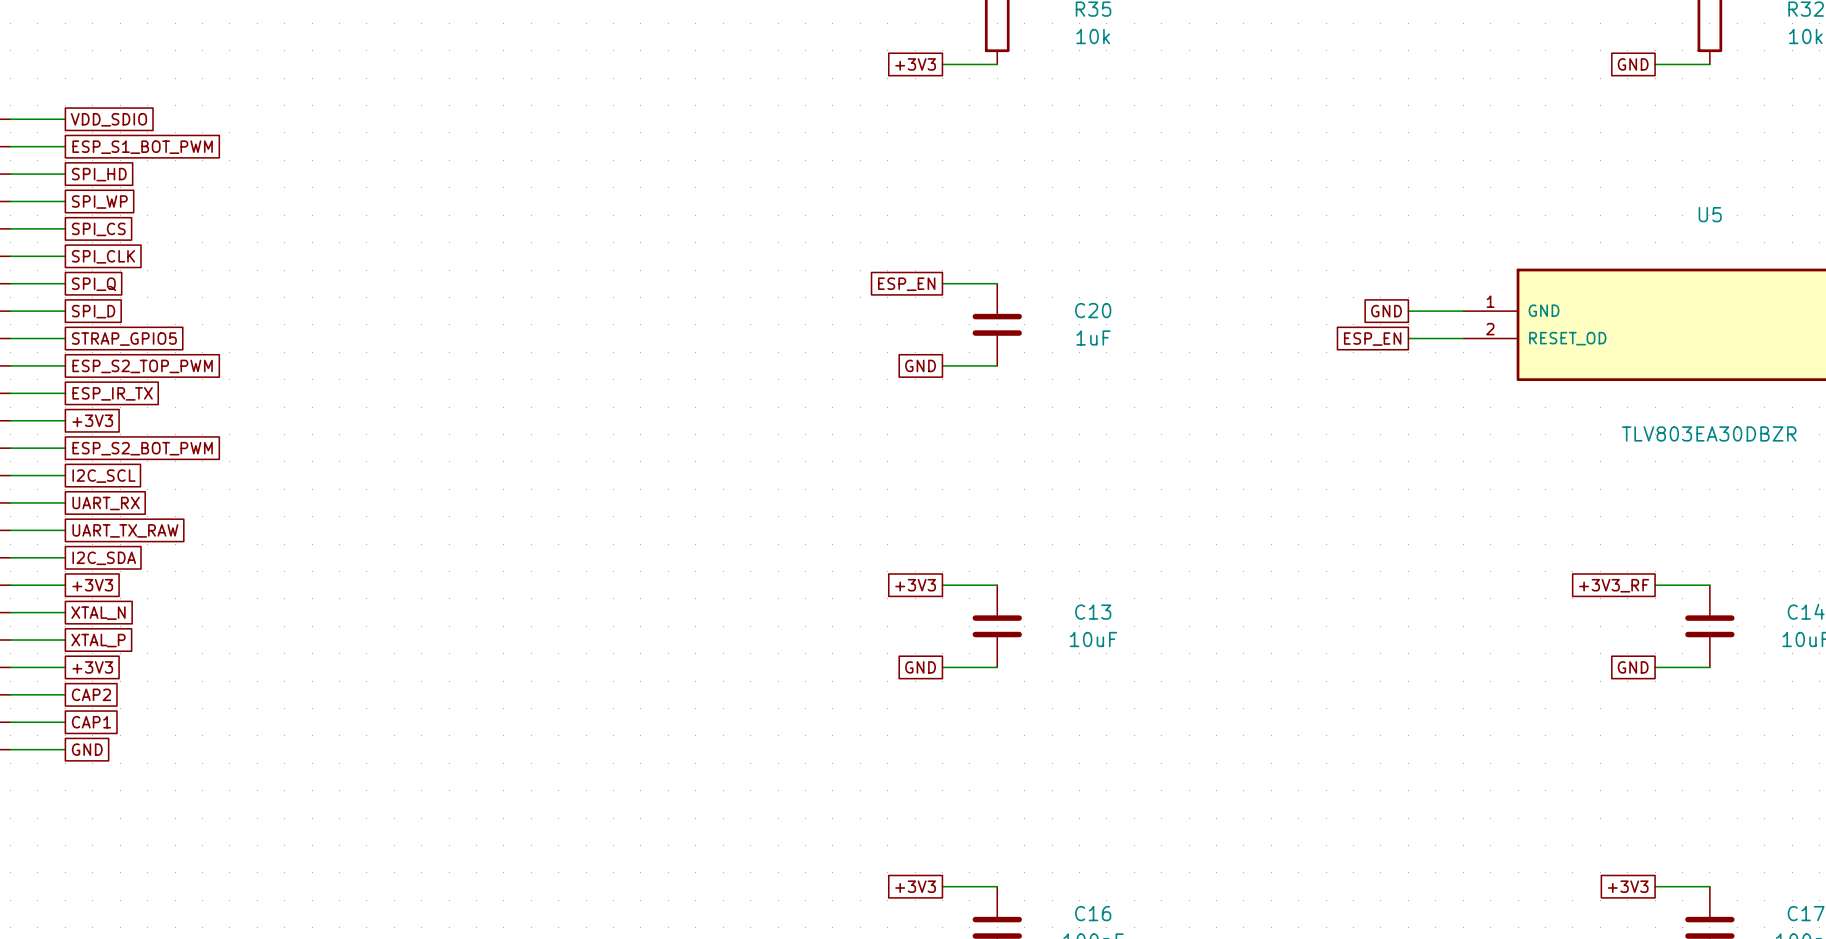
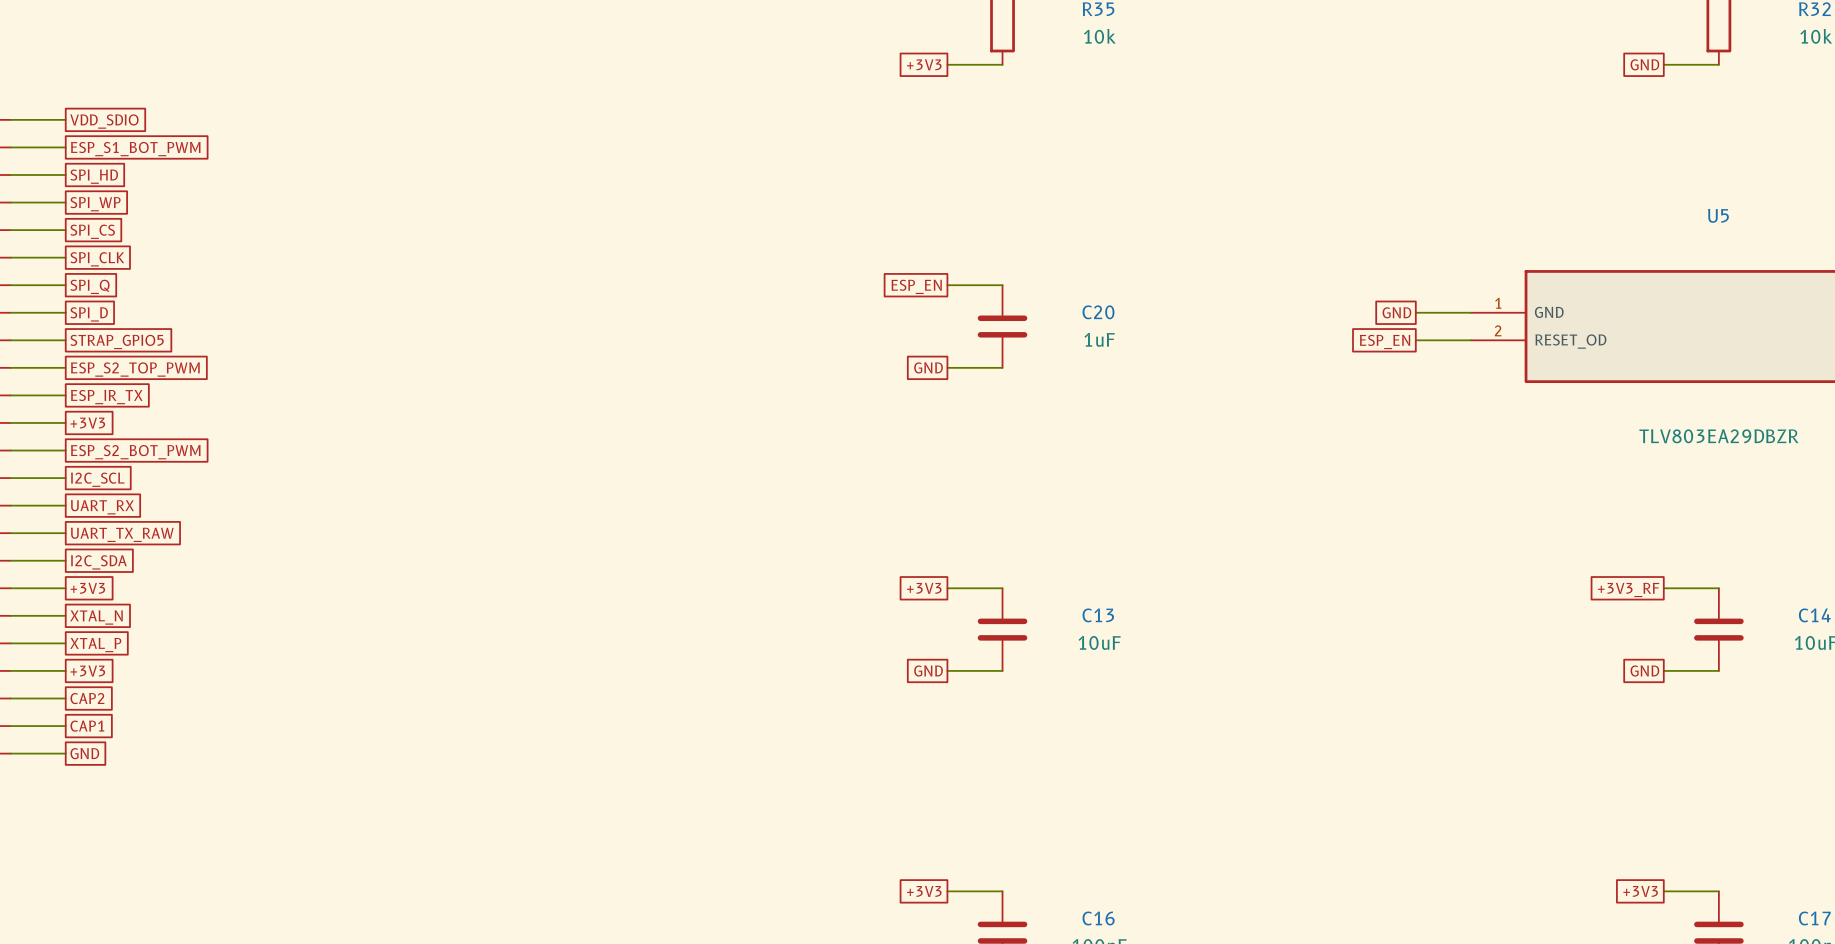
U5 value: TLV803EA30DBZR (1709, 433) -> TLV803EA29DBZR (1718, 436)

